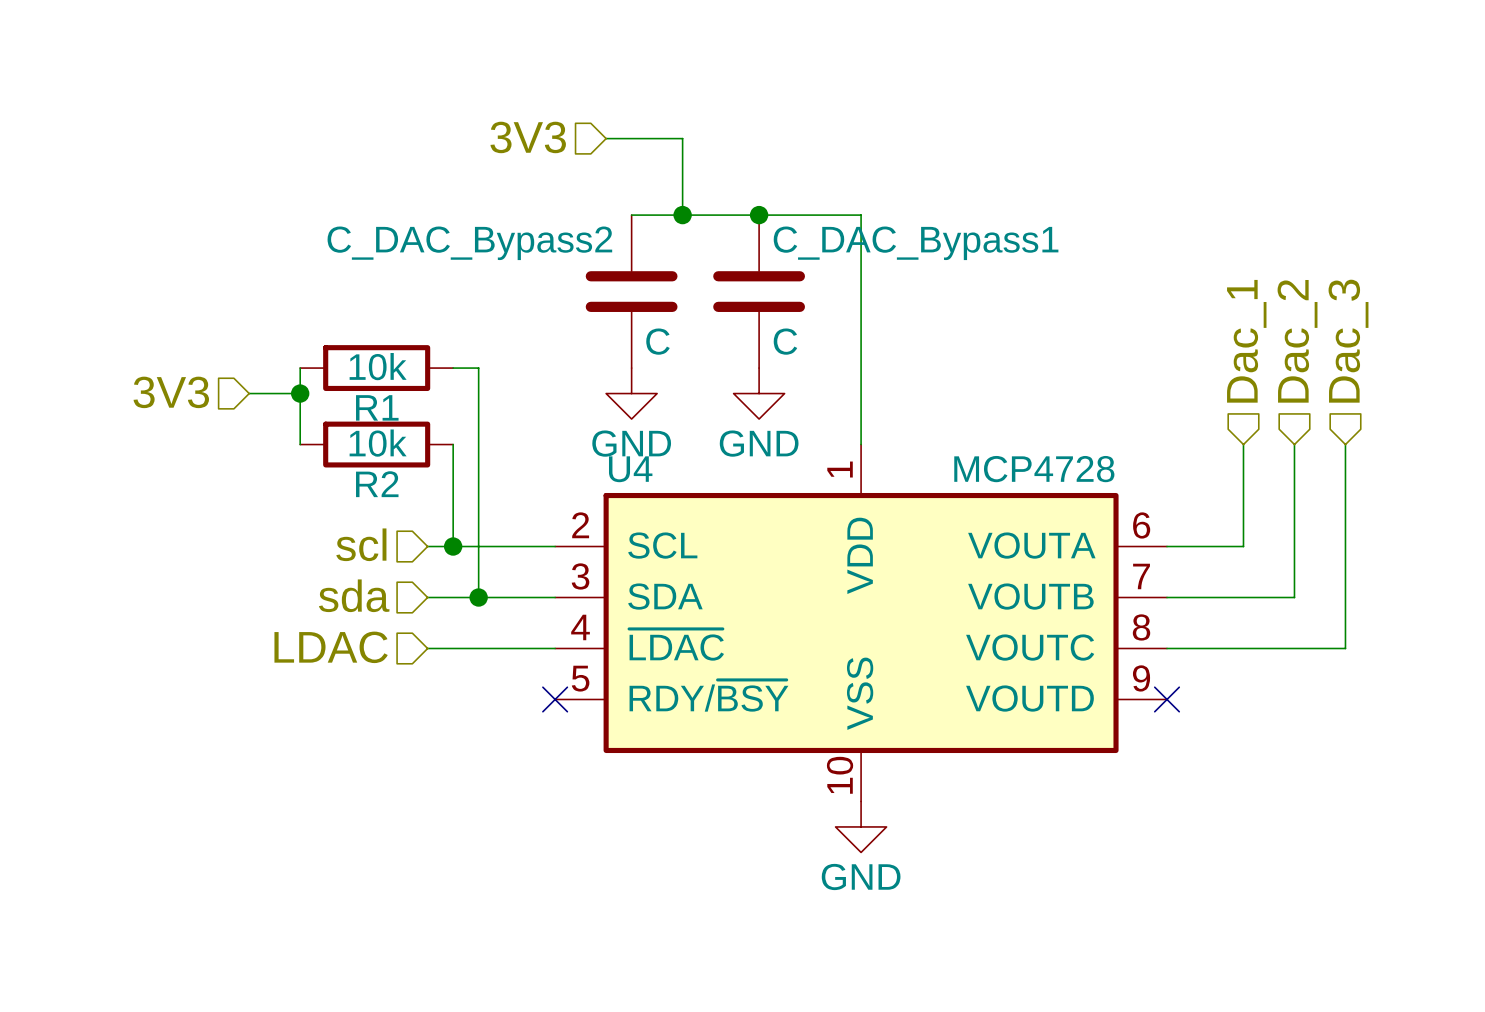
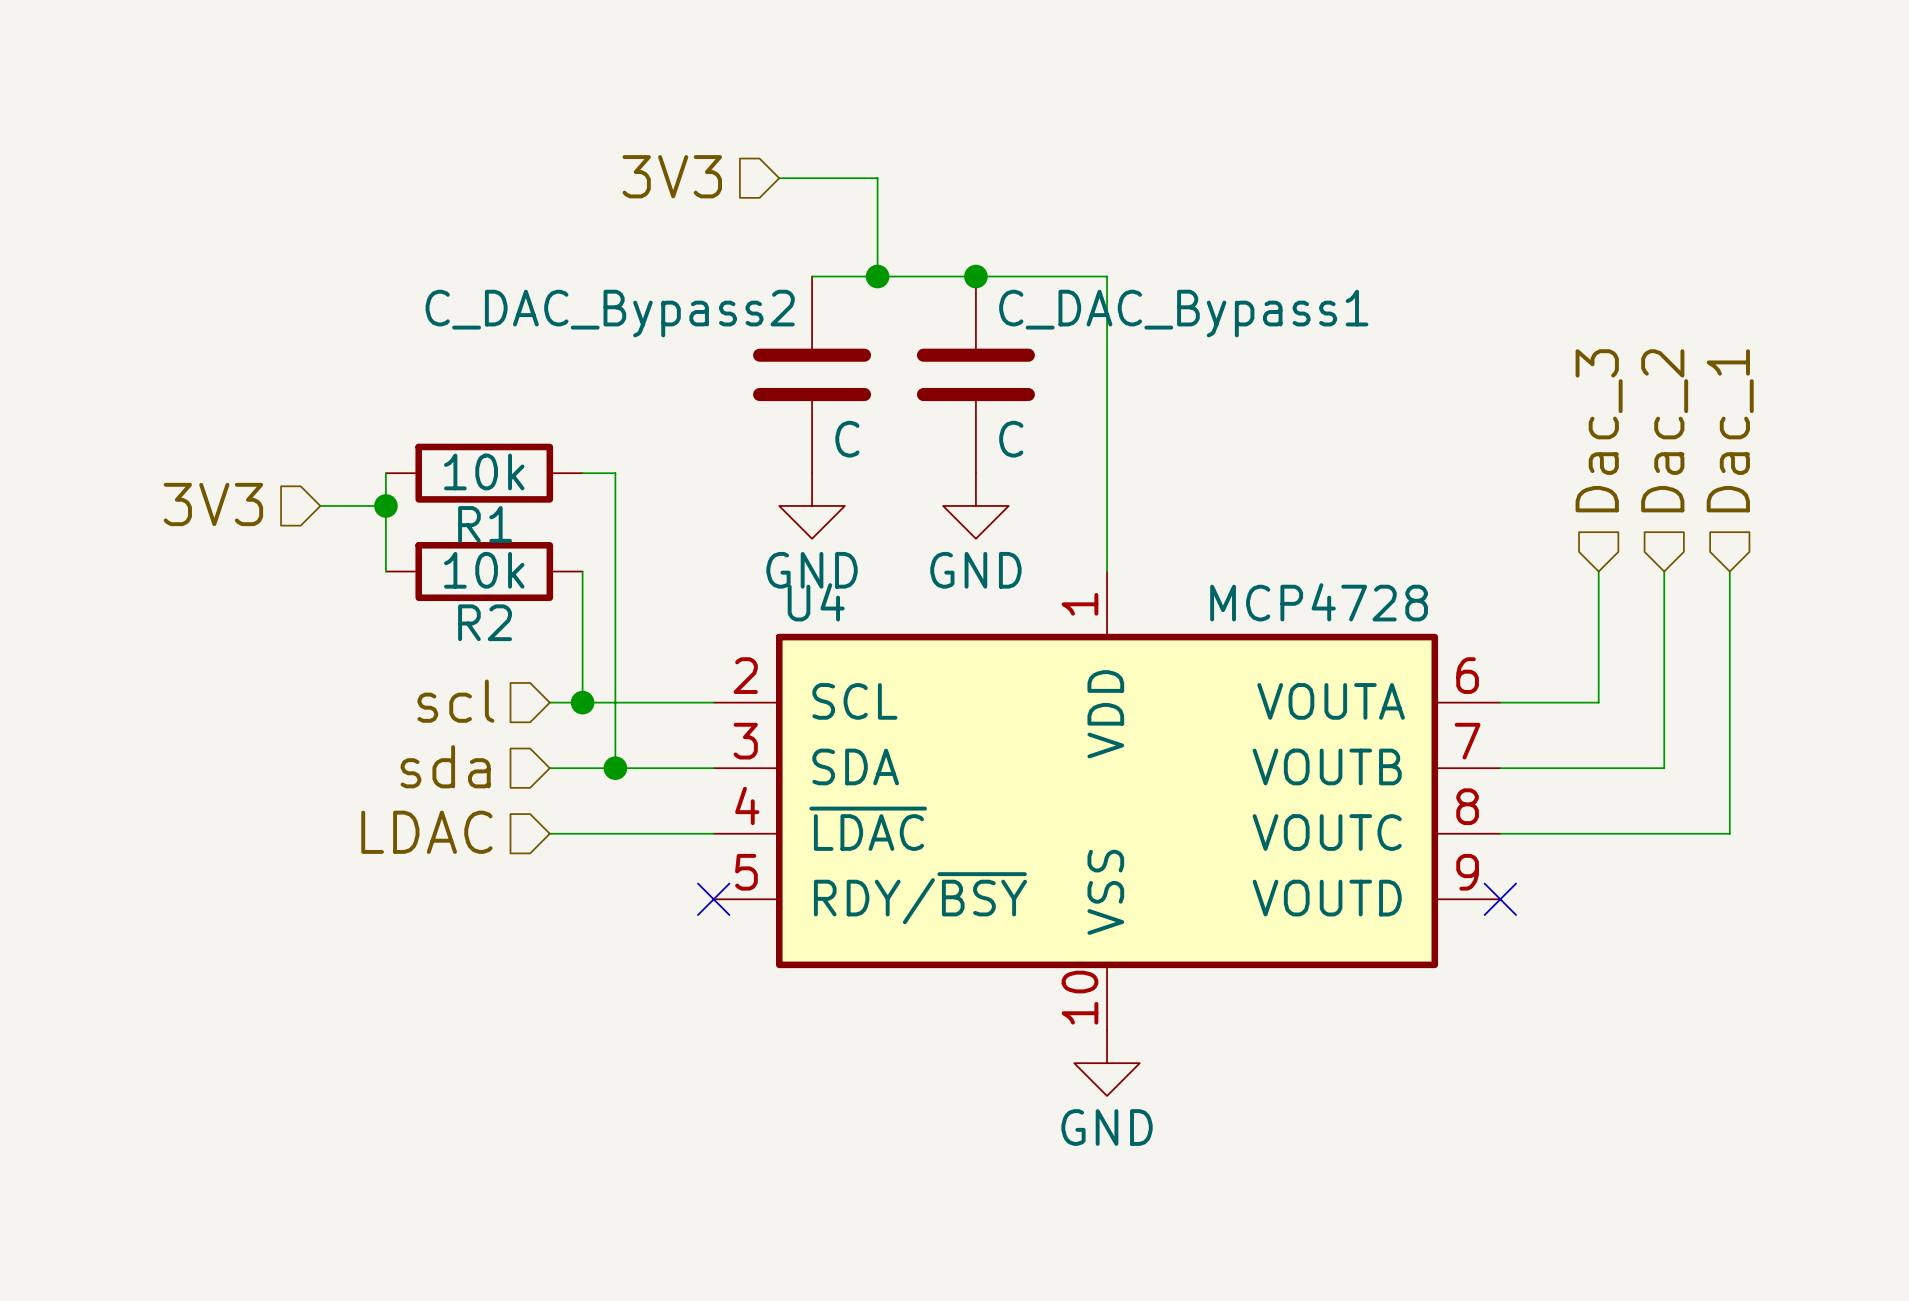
hierarchical label: Dac_1 (1246, 341) -> Dac_3 (1599, 430)
hierarchical label: Dac_3 (1348, 341) -> Dac_1 (1730, 430)

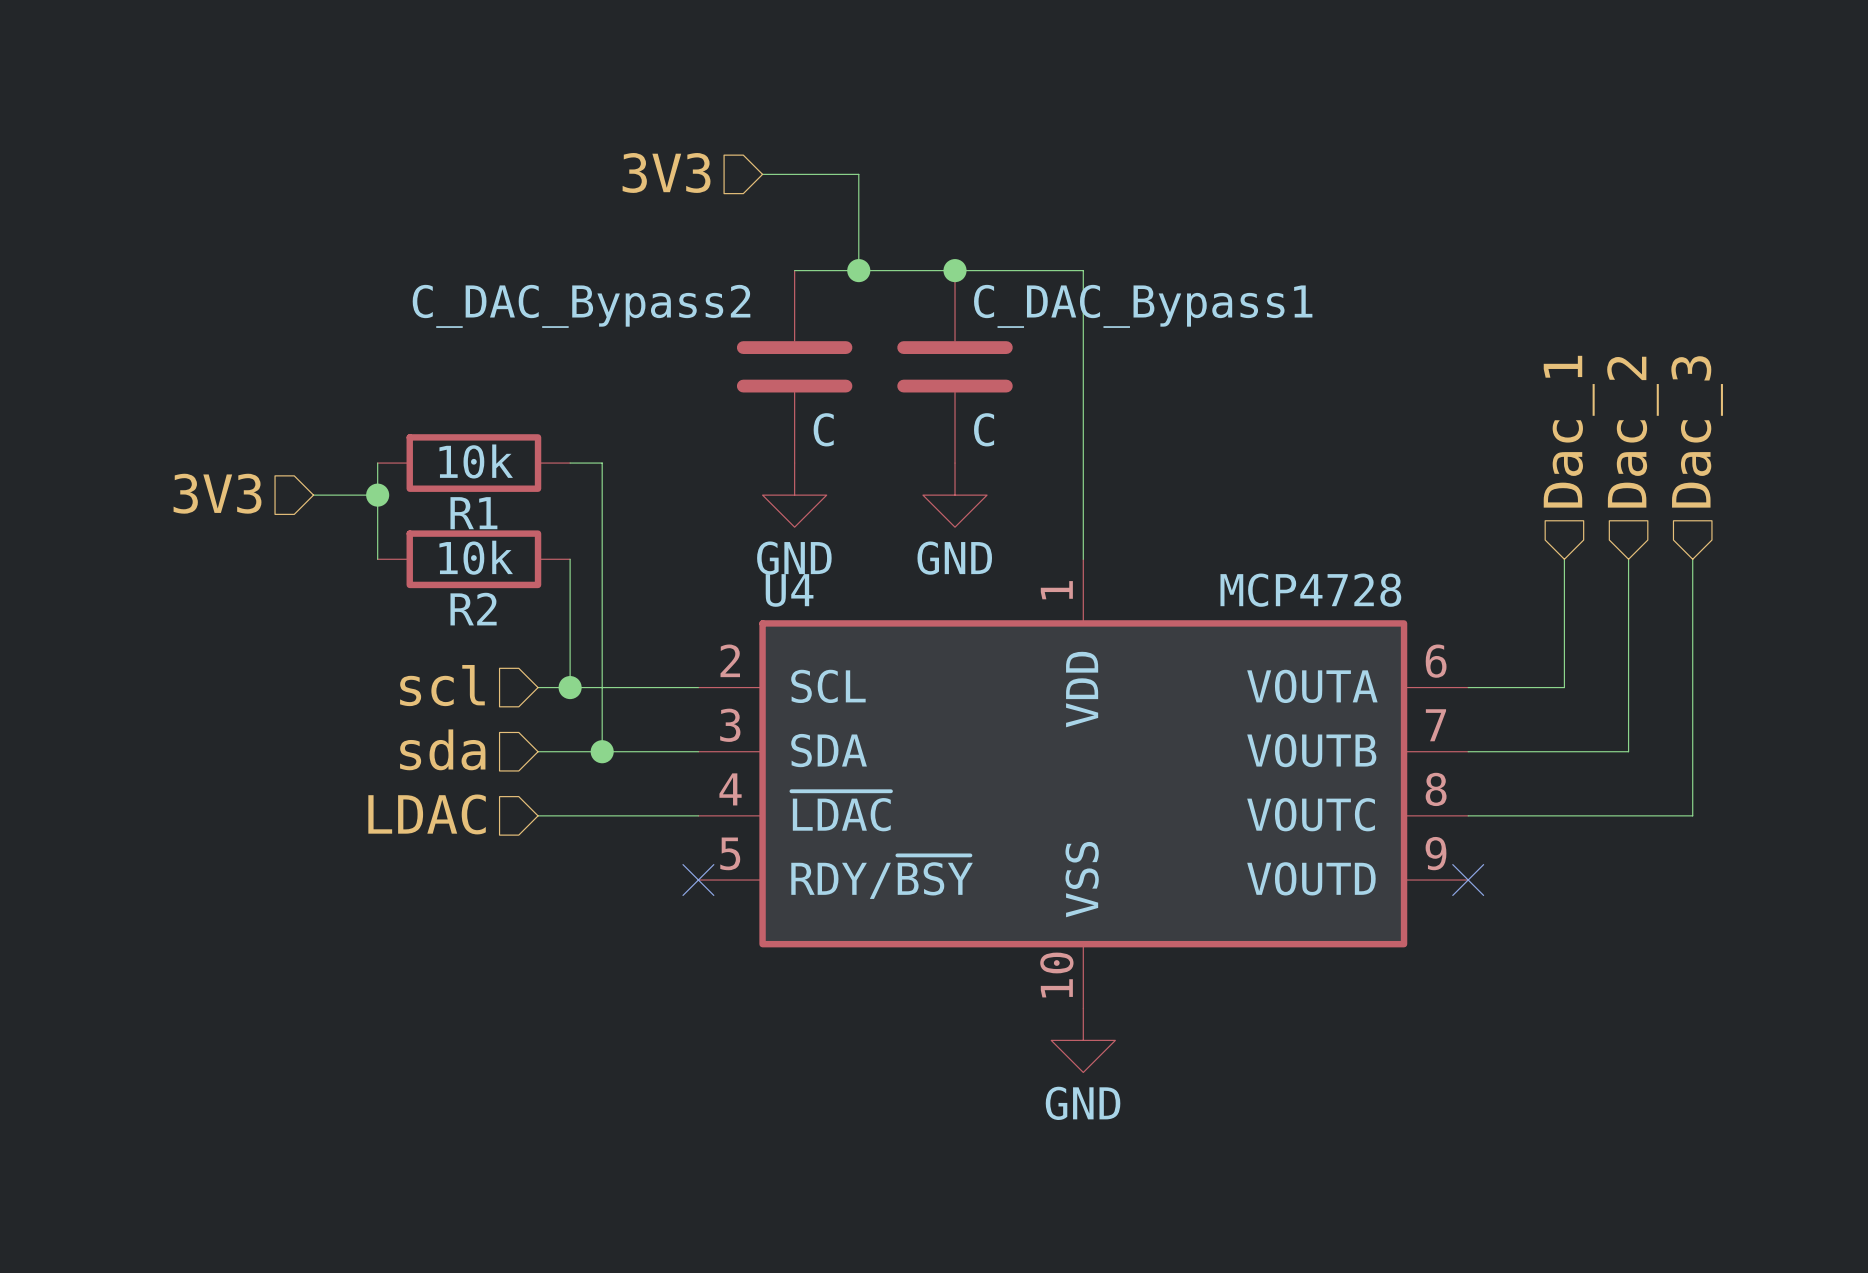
hierarchical label: Dac_3 (1599, 430) -> Dac_1 (1569, 431)
hierarchical label: Dac_1 (1730, 430) -> Dac_3 (1697, 431)

